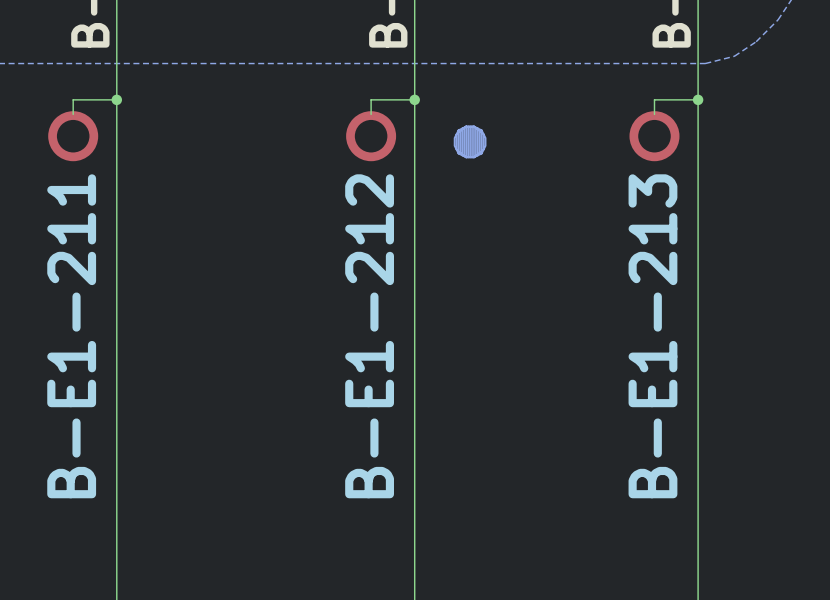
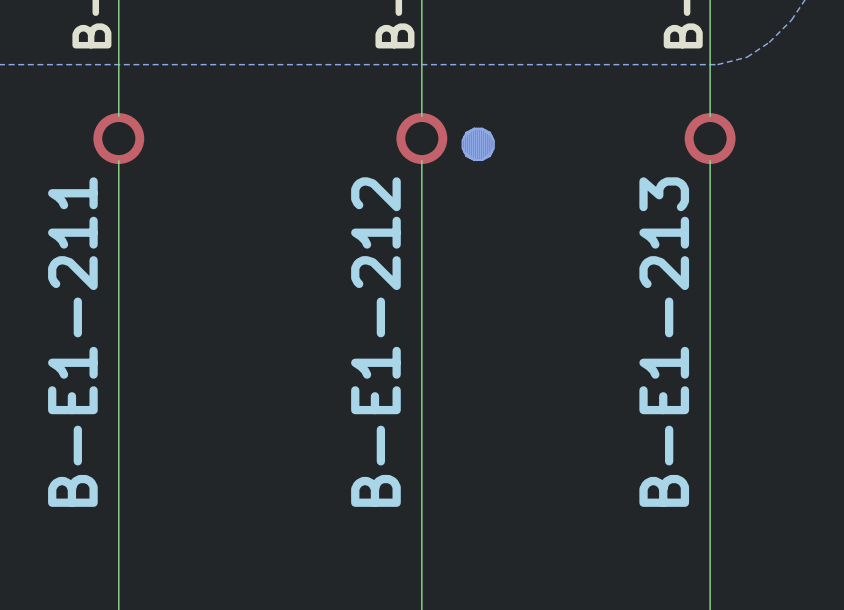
wire: (116, 99) (73, 99) (73, 114) -> none
junction: (116, 99) -> none
wire: (414, 99) (371, 99) (371, 114) -> none
junction: (414, 99) -> none
wire: (698, 99) (654, 99) (654, 114) -> none
junction: (698, 99) -> none
wire: (116, 114) (116, 158) -> none
wire: (414, 114) (414, 158) -> none
wire: (698, 114) (698, 158) -> none
part position: (73, 136) -> (118, 138)
part position: (371, 136) -> (421, 138)
part position: (654, 136) -> (710, 138)

